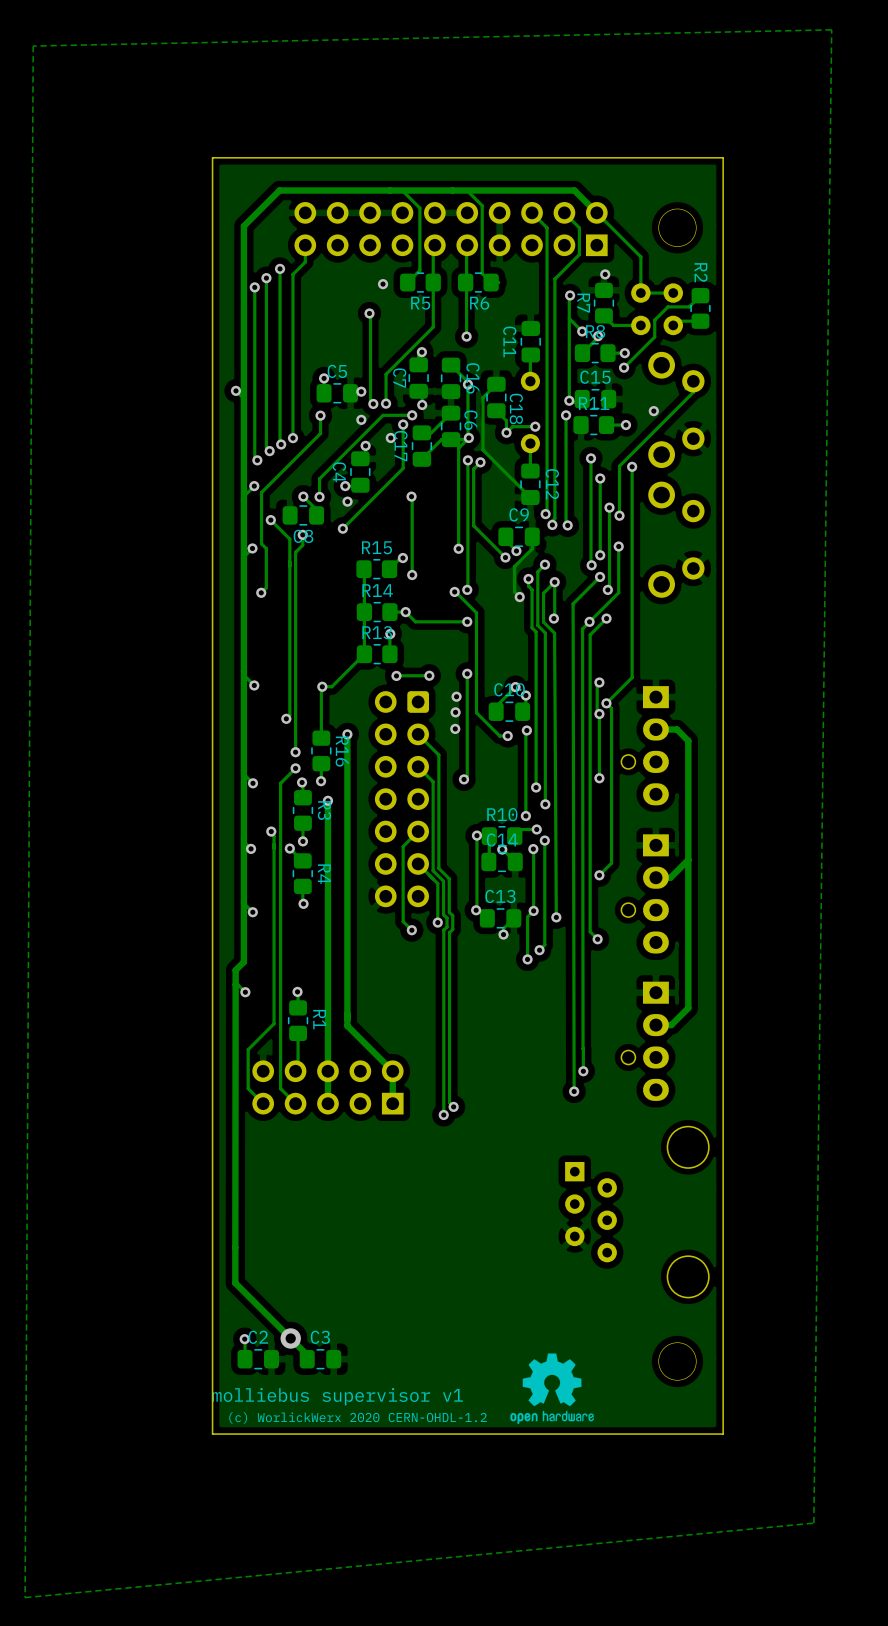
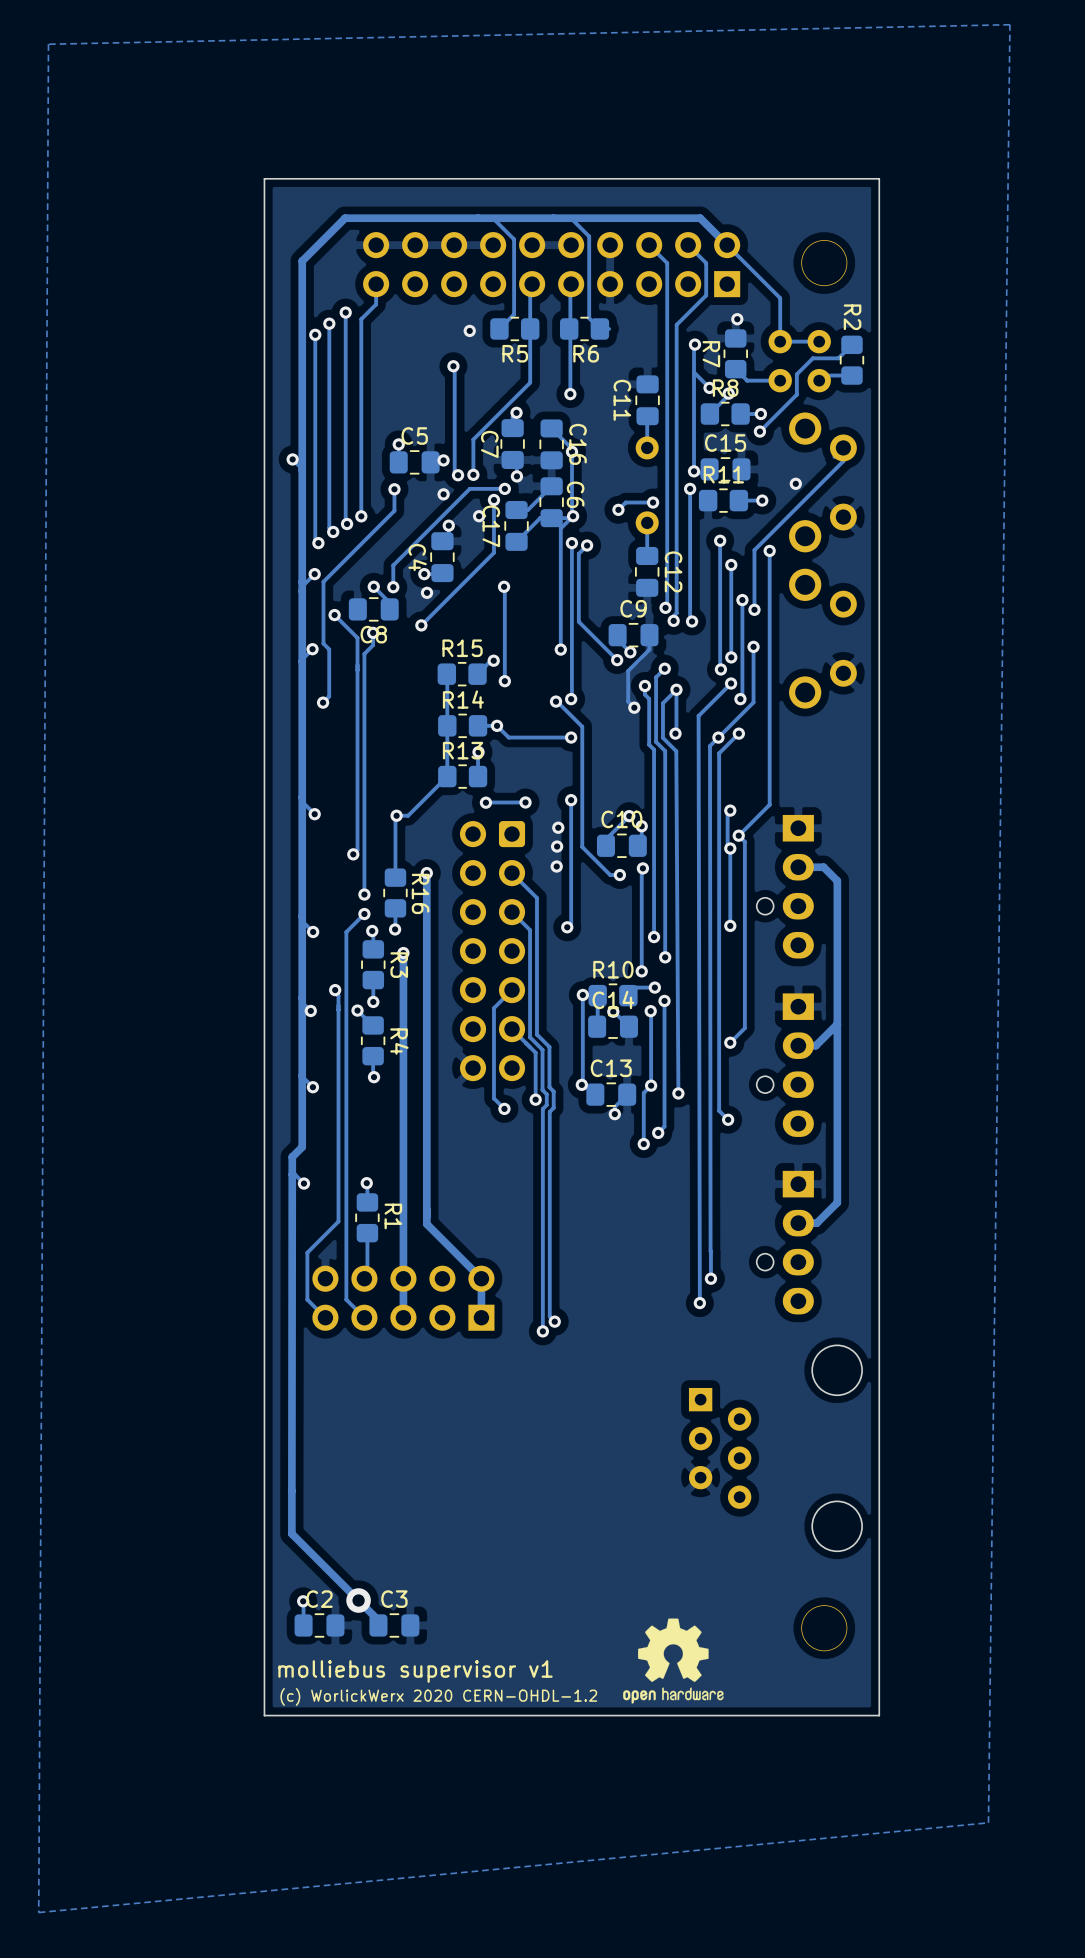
track: (496, 384) (483, 397) (483, 450) (530, 497) -> none
C18: (496, 397) -> none
track: (496, 410) (506, 420) (506, 432) -> none

